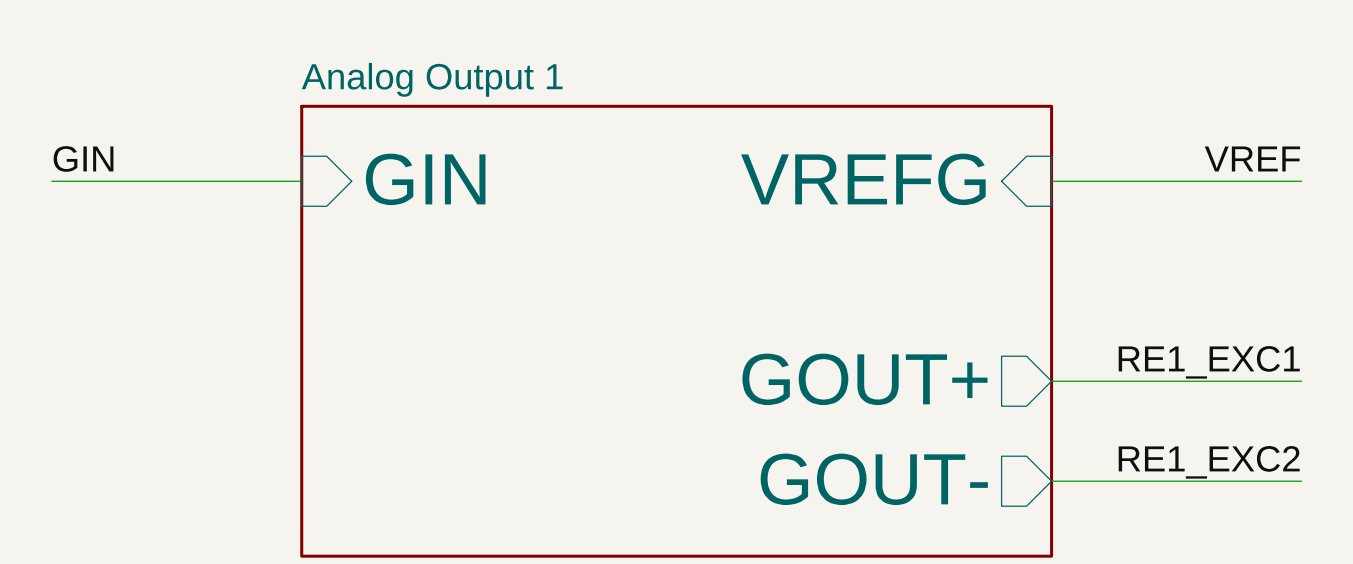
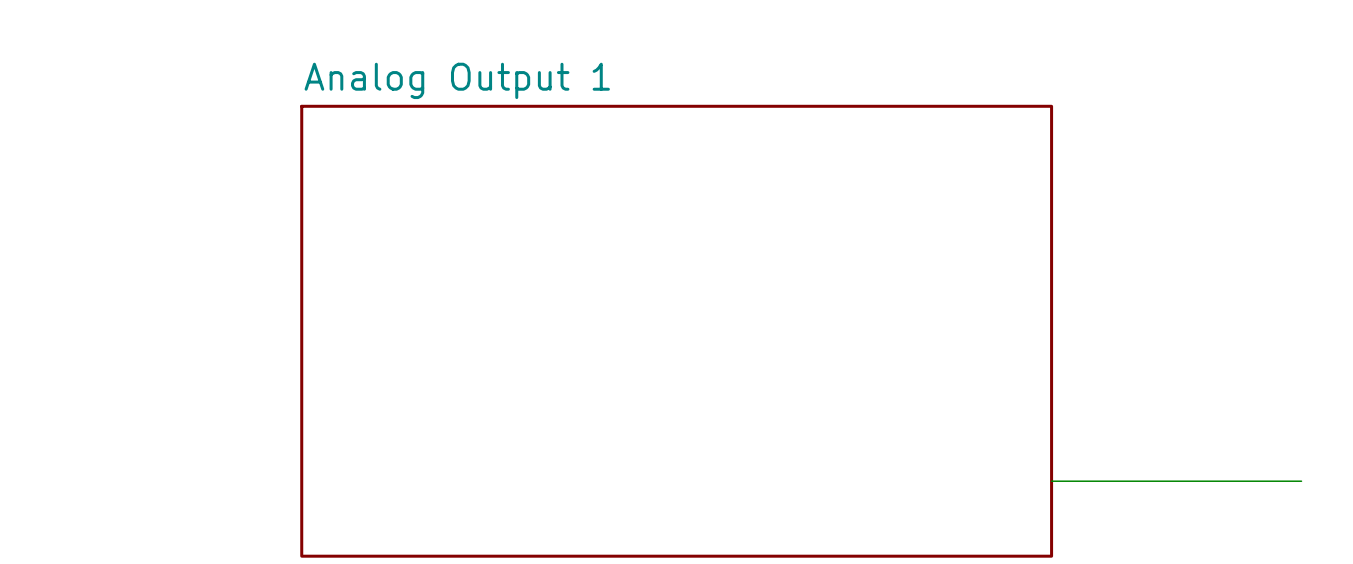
label: GIN (83, 158) -> none
label: VREF (1252, 158) -> none
sheet pin: GIN (425, 179) -> none
sheet pin: VREFG (863, 179) -> none
wire: (51, 181) (301, 181) -> none
wire: (1051, 181) (1301, 181) -> none
label: RE1_EXC1 (1209, 362) -> none
sheet pin: GOUT+ (864, 379) -> none
wire: (1051, 381) (1301, 381) -> none
label: RE1_EXC2 (1209, 462) -> none
sheet pin: GOUT- (874, 479) -> none

